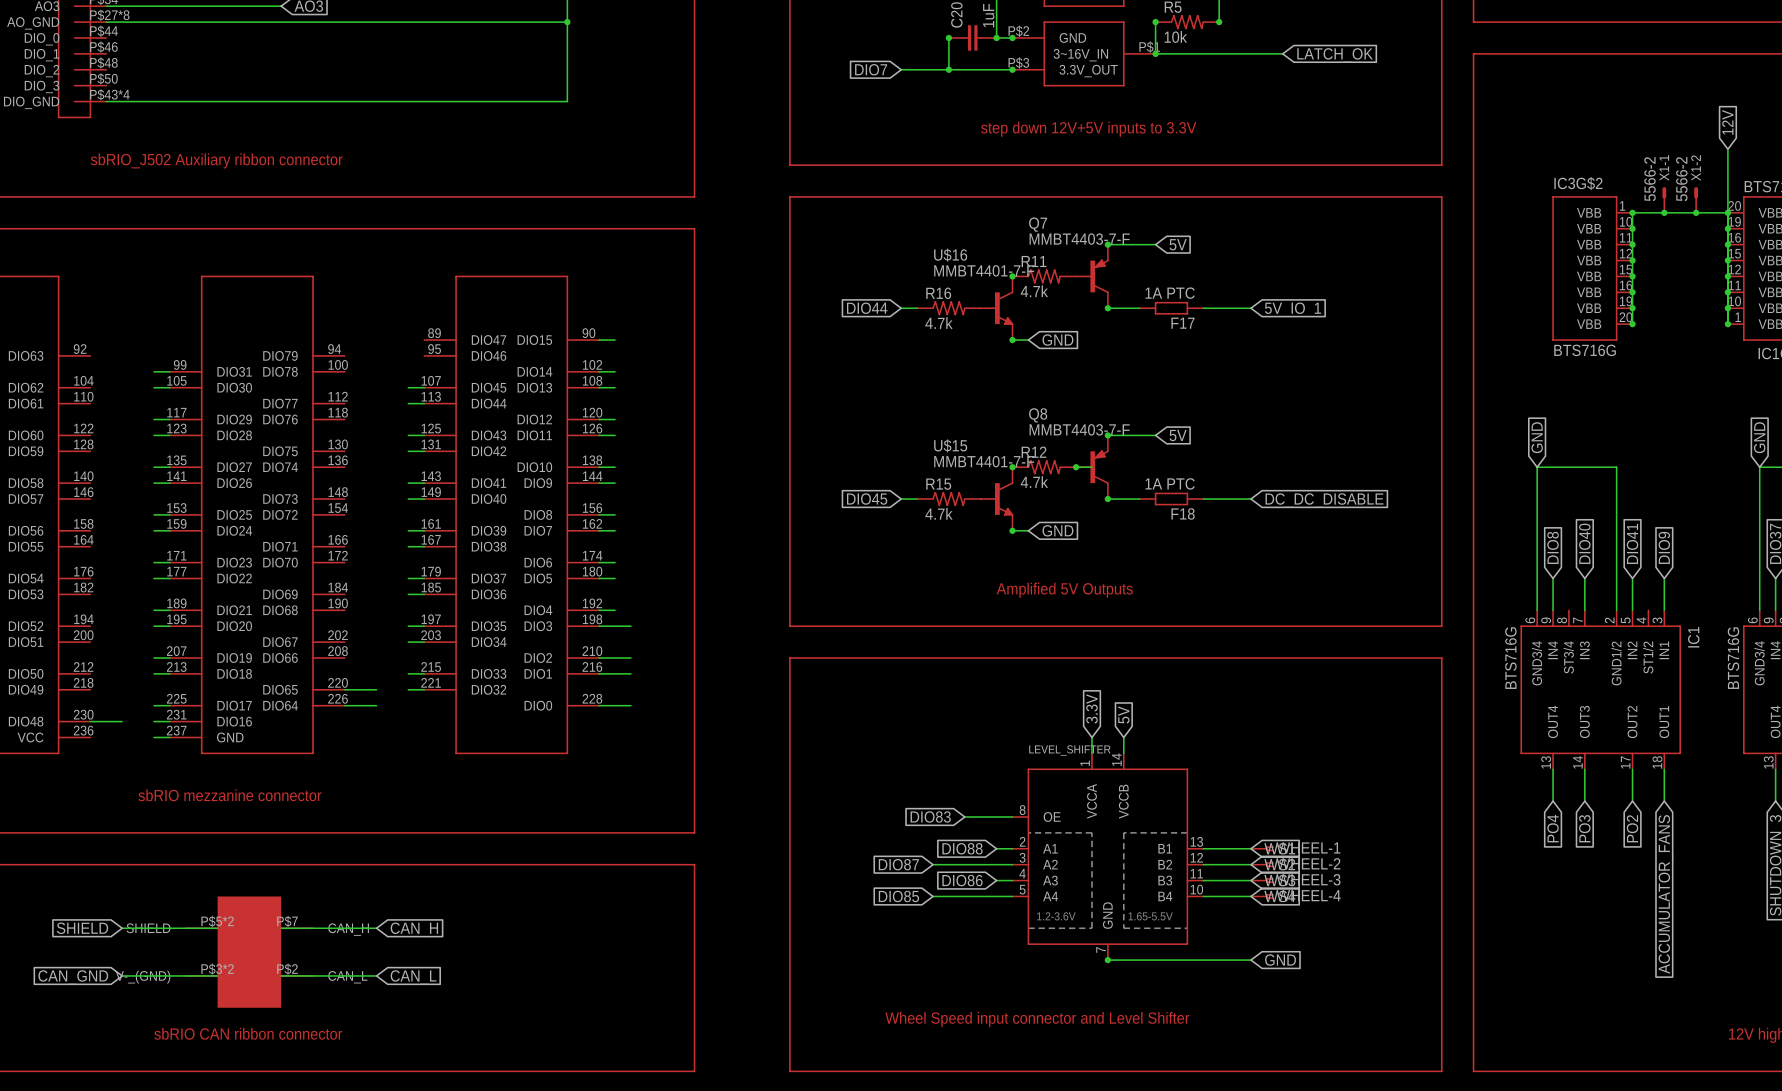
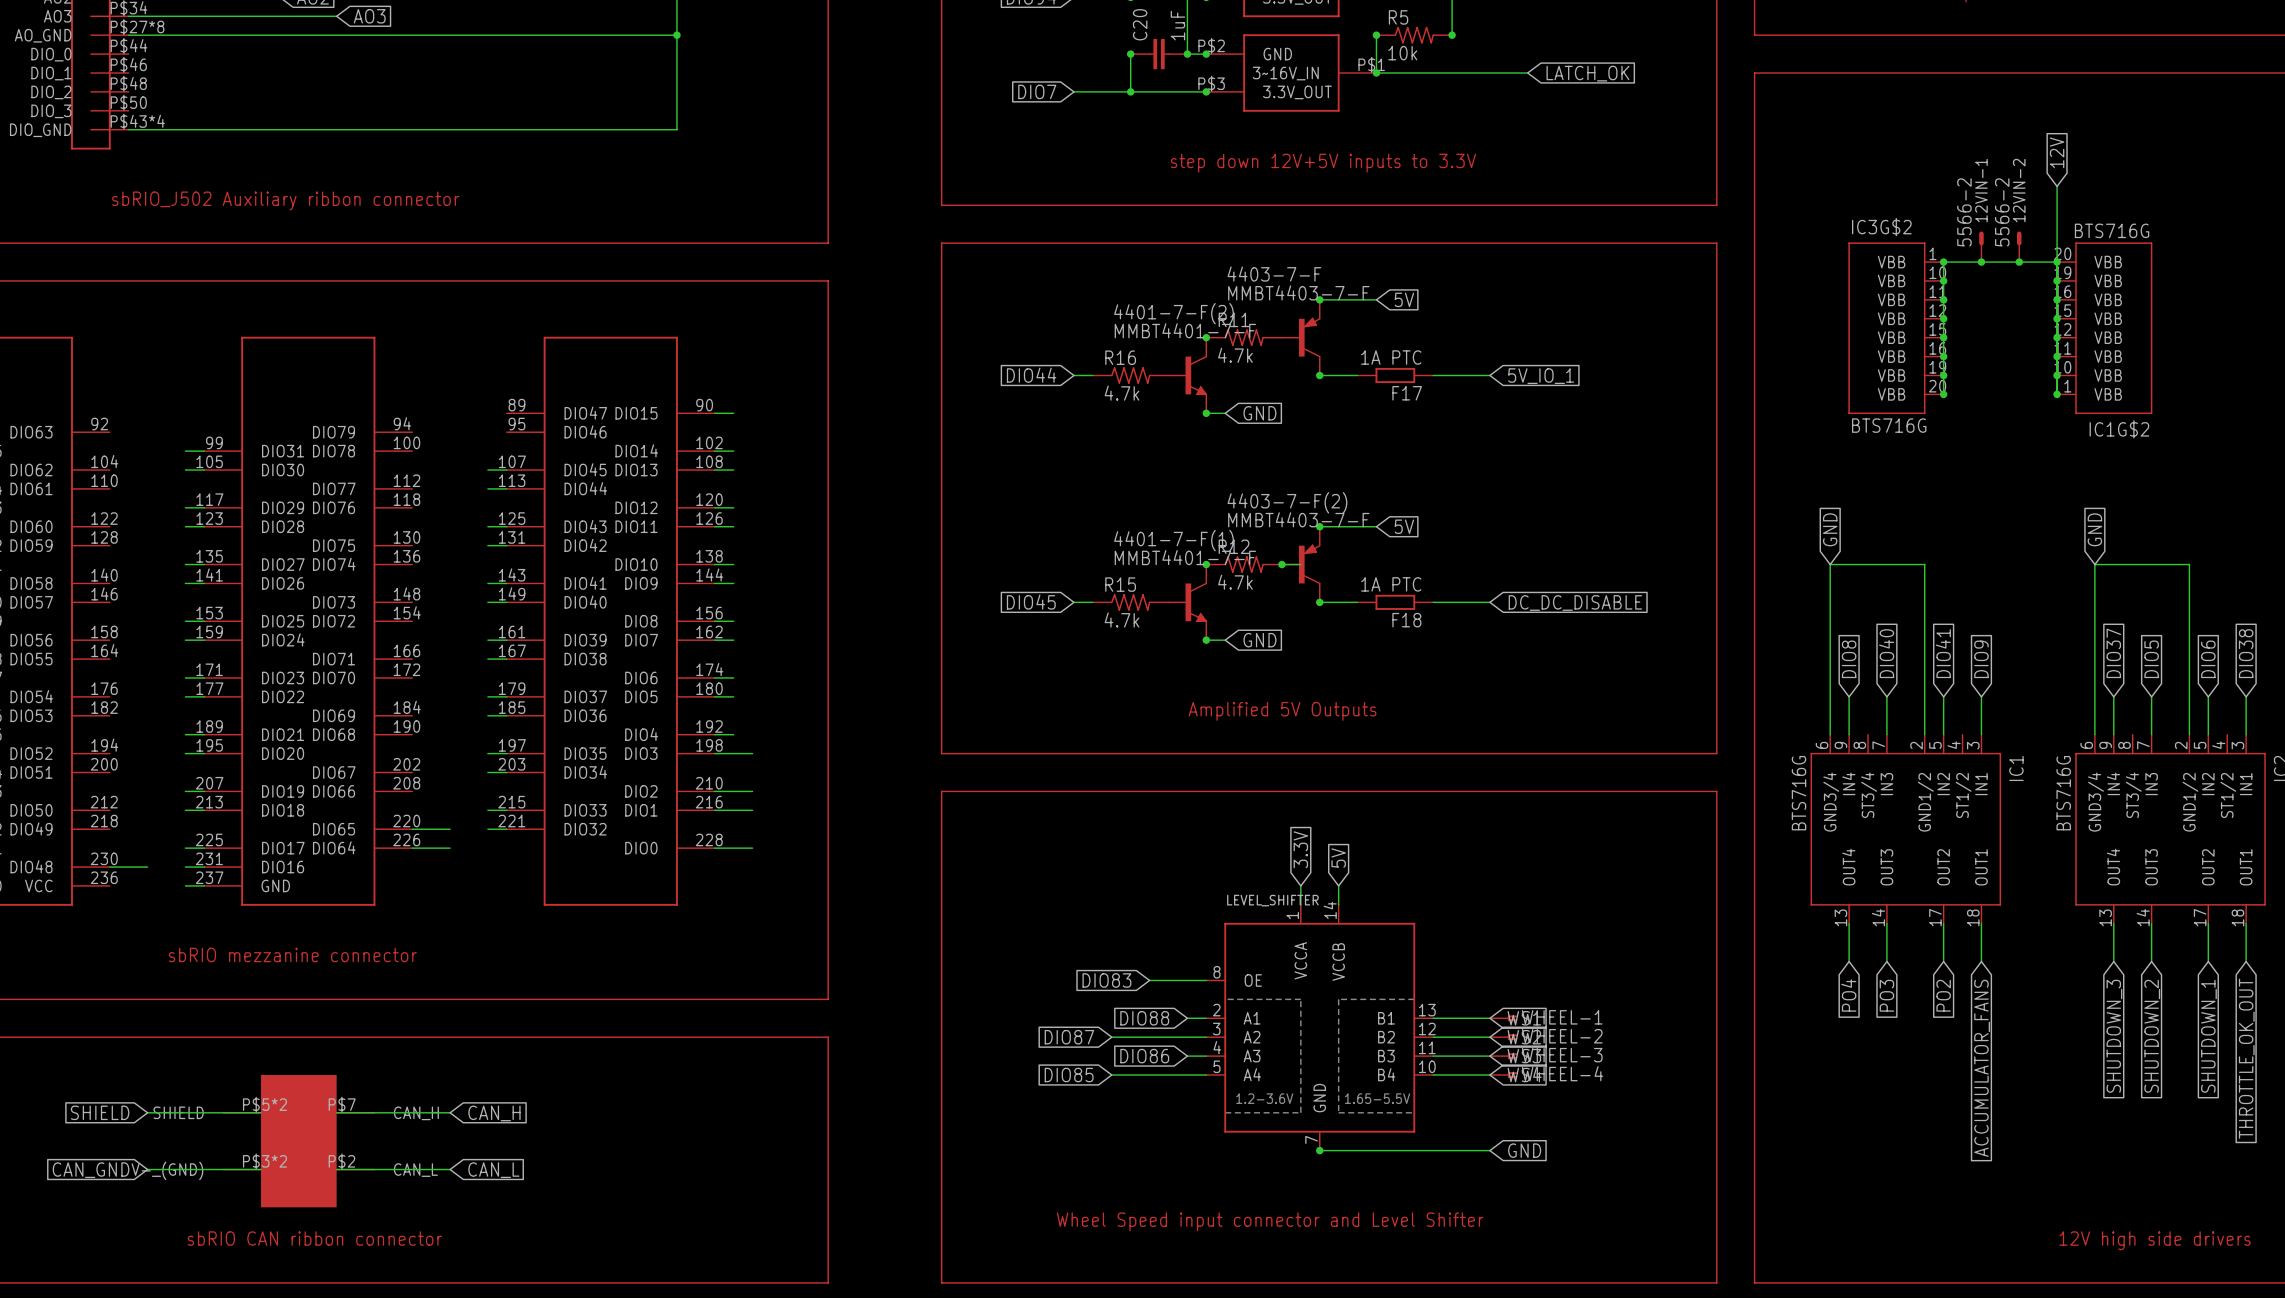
X1-1 name: X1-1 (1664, 168) -> 12VIN-1 (1981, 190)
X1-2 name: X1-2 (1696, 168) -> 12VIN-2 (2019, 190)
Q7 name: Q7 (1038, 224) -> 4403-7-F (1274, 274)
U$16 name: U$16 (950, 255) -> 4401-7-F(2) (1174, 313)
Q8 name: Q8 (1038, 415) -> 4403-7-F(2) (1287, 502)
U$15 name: U$15 (950, 445) -> 4401-7-F(1) (1174, 540)

